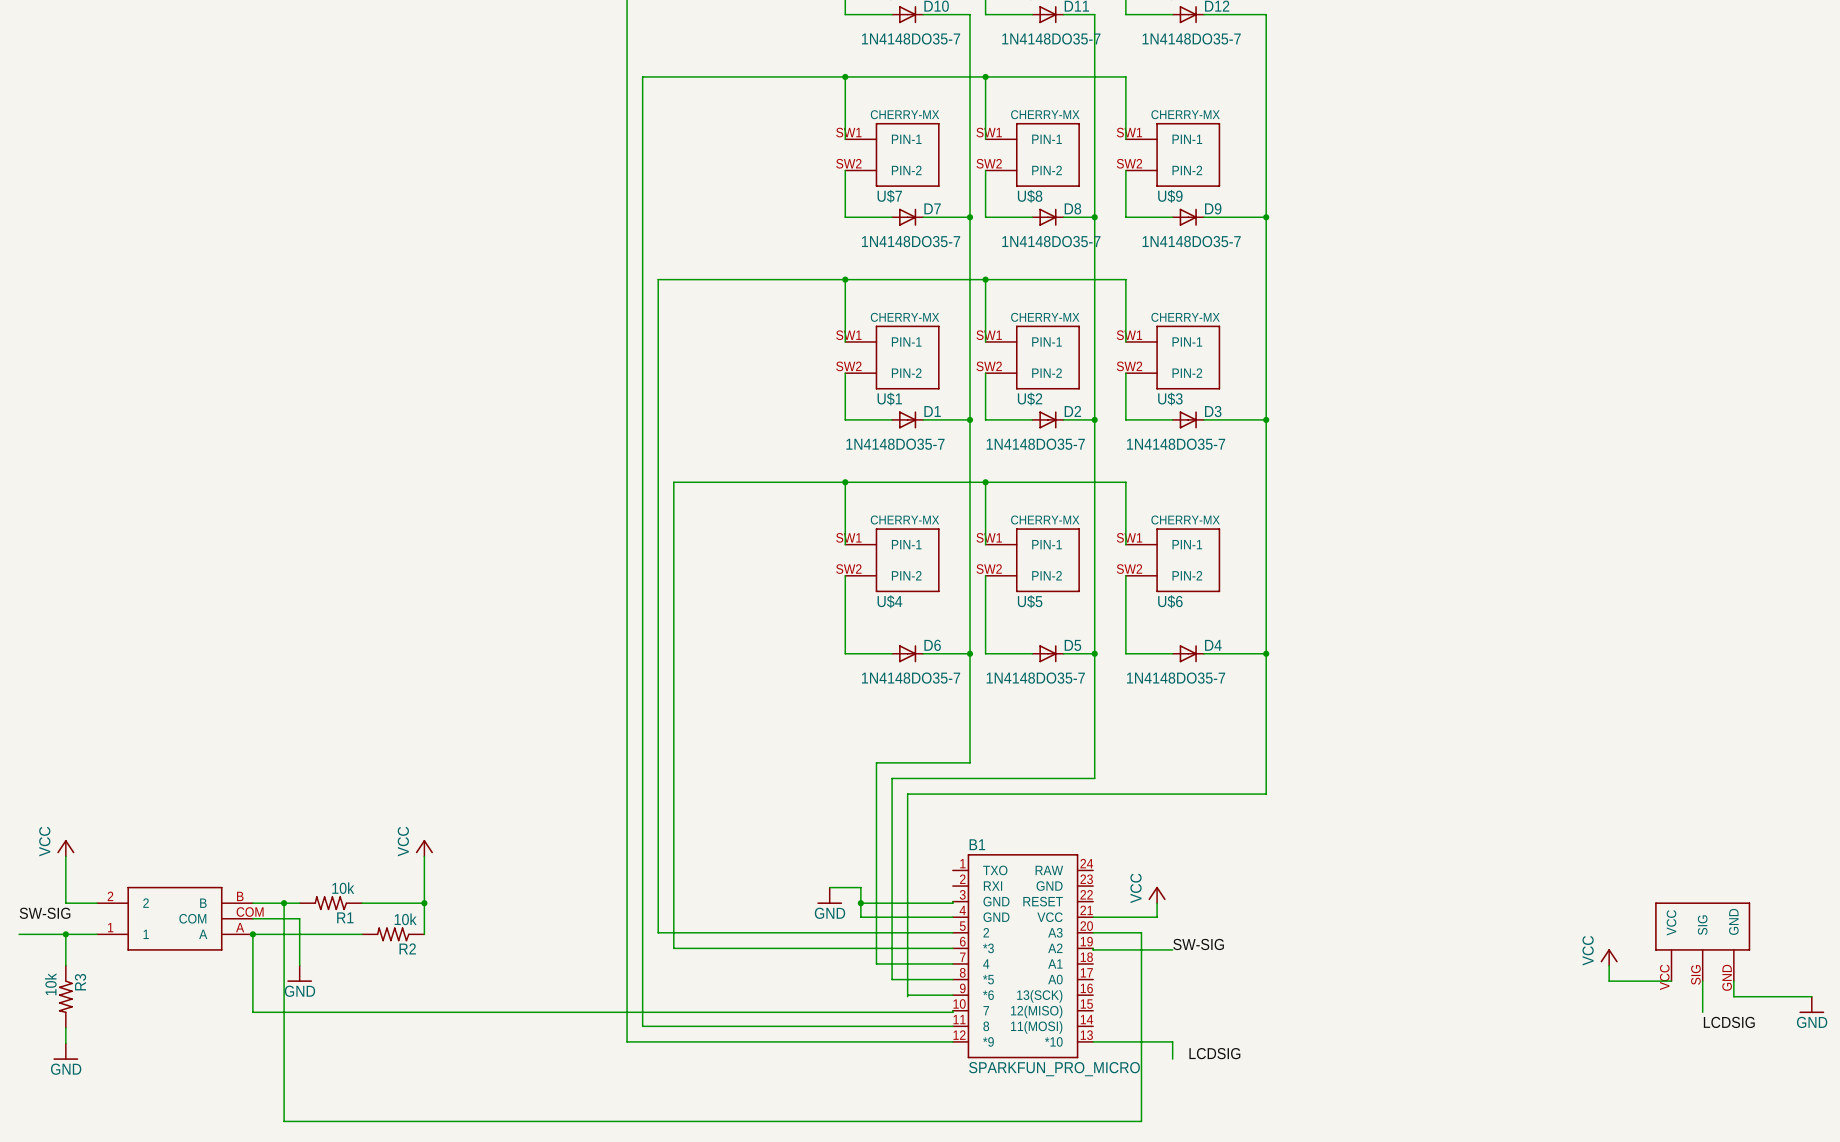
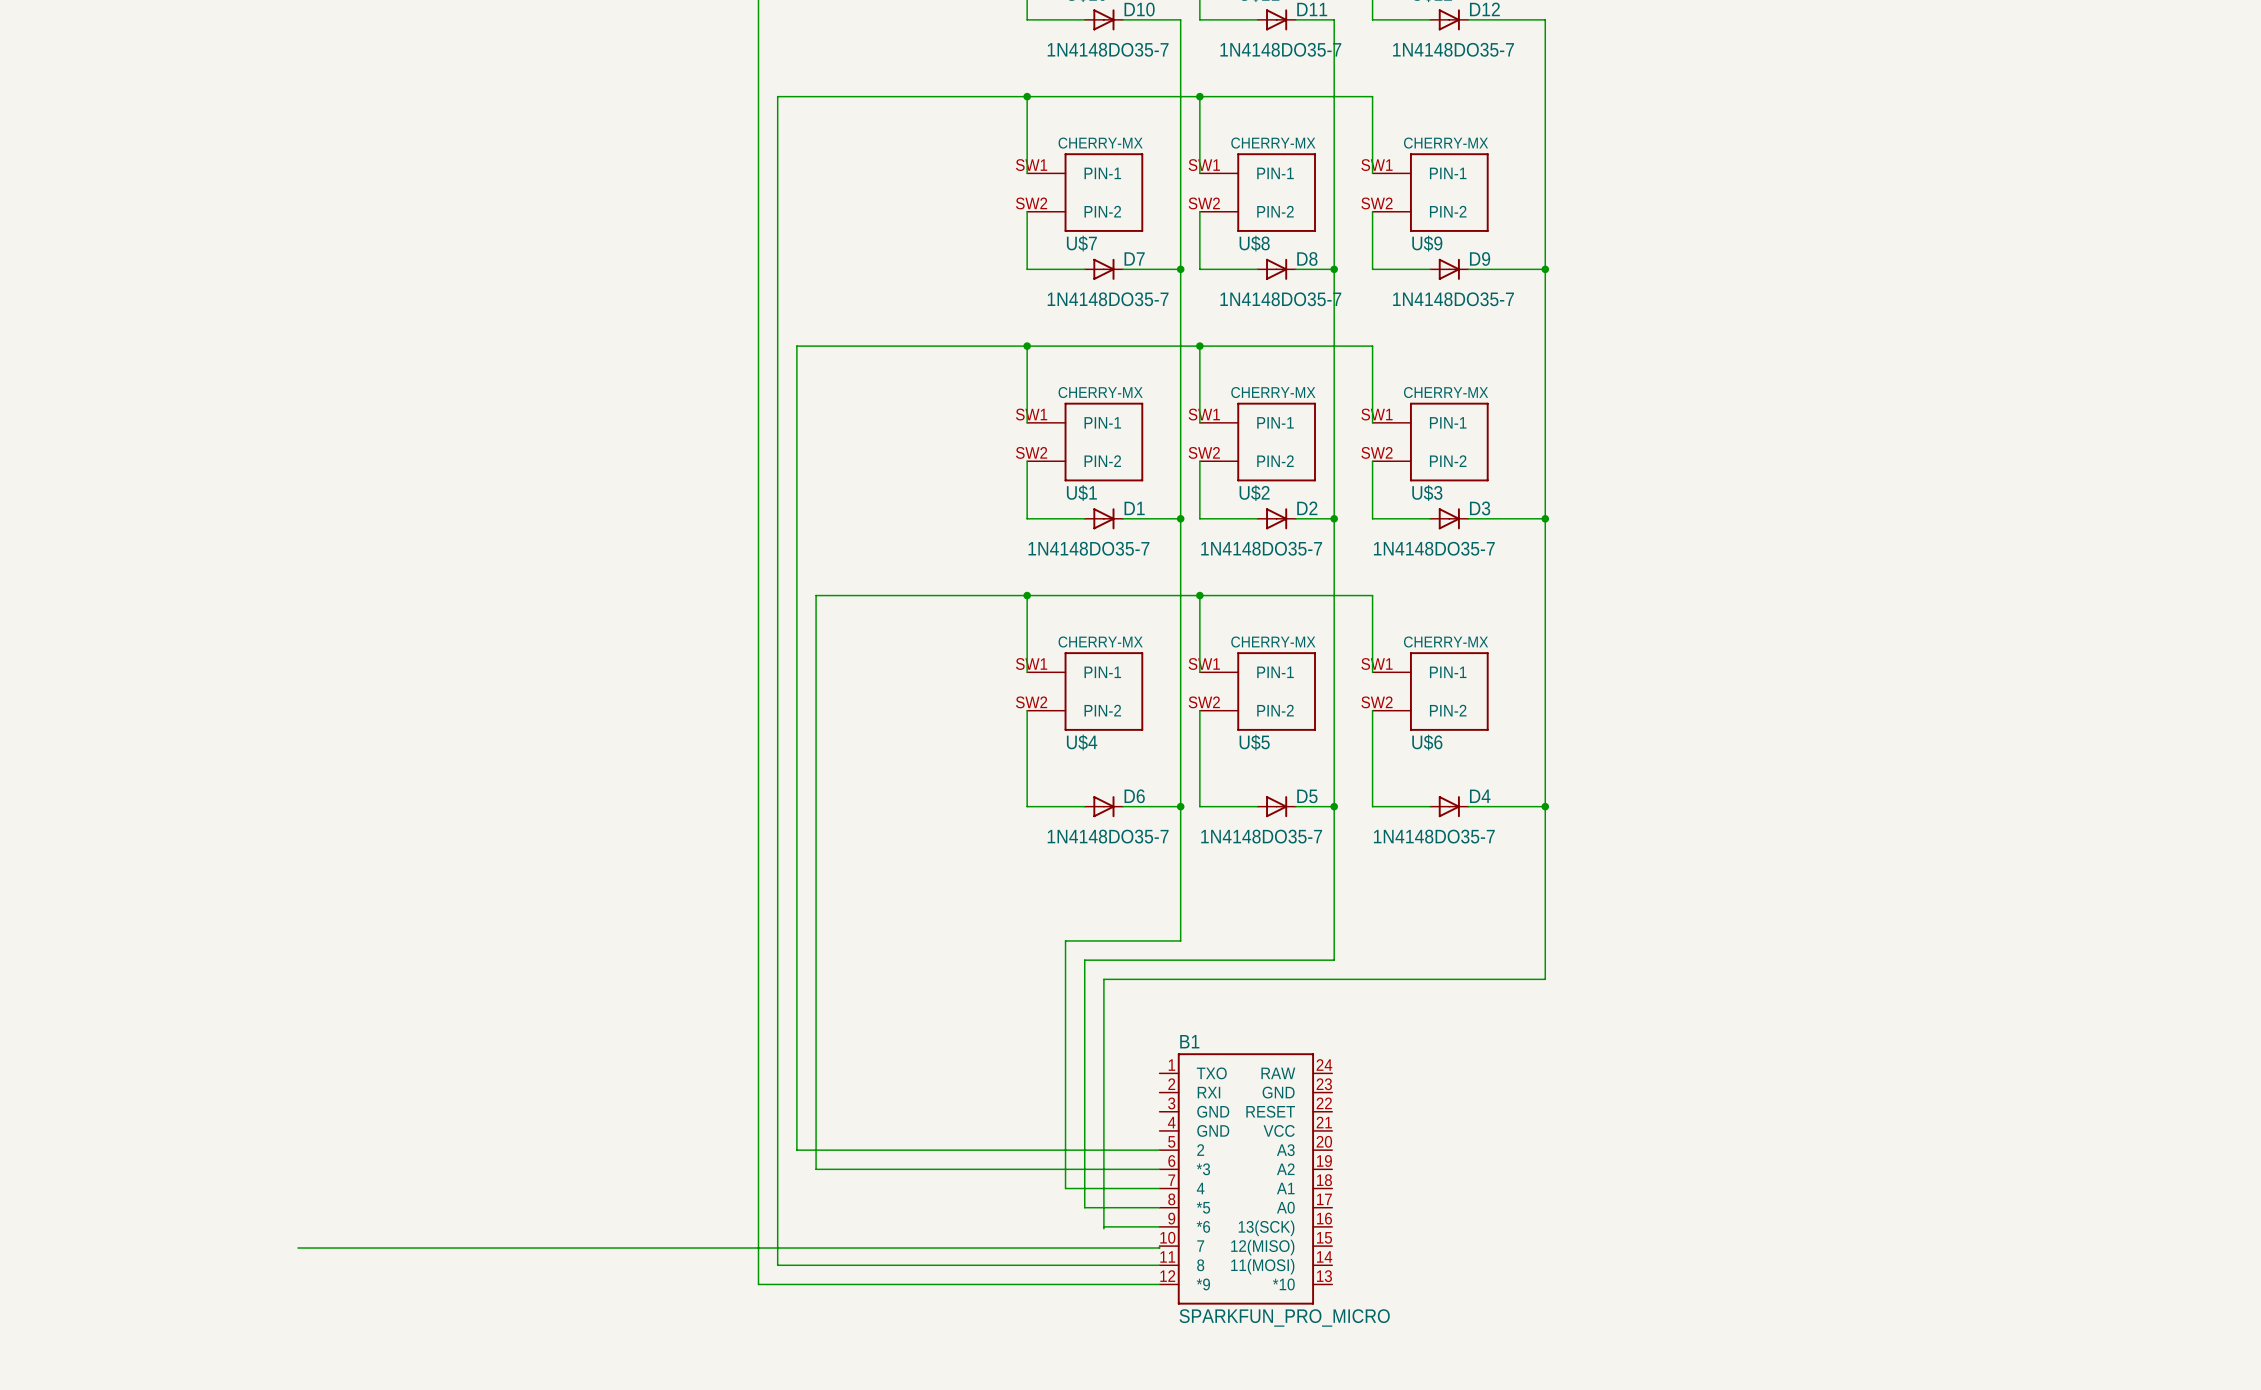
power symbol: VCC (65, 848) -> none
power symbol: VCC (424, 848) -> none
wire: (65, 856) (65, 903) (97, 903) -> none
wire: (424, 856) (424, 934) -> none
wire: (829, 887) (860, 887) (860, 917) (952, 917) -> none
power symbol: GND (829, 895) -> none
power symbol: VCC (1157, 895) -> none
wire: (952, 901) (952, 903) (860, 903) -> none
wire: (252, 903) (299, 903) -> none
wire: (284, 903) (284, 1121) (1141, 1121) (1141, 932) (1093, 932) -> none
junction: (284, 903) -> none
R1: 10k (330, 903) -> none
wire: (362, 903) (424, 903) -> none
junction: (424, 903) -> none
junction: (860, 903) -> none
wire: (1157, 903) (1157, 917) (1093, 917) -> none
label: SW-SIG (45, 913) -> none
part: (174, 918) -> none
wire: (252, 918) (299, 918) (299, 965) -> none
wire: (19, 934) (97, 934) -> none
wire: (65, 934) (65, 965) -> none
junction: (65, 934) -> none
junction: (252, 934) -> none
wire: (362, 934) (252, 934) (252, 1012) -> none
R2: 10k (393, 934) -> none
part: (1702, 941) -> none
label: SW-SIG (1198, 944) -> none
wire: (1093, 948) (1093, 949) (1172, 949) -> none
power symbol: VCC (1609, 957) -> none
wire: (1609, 965) (1609, 981) (1671, 981) -> none
power symbol: GND (299, 973) -> none
wire: (1702, 981) (1702, 1012) -> none
wire: (1733, 981) (1733, 996) (1811, 996) -> none
R3: 10k (65, 996) -> none
power symbol: GND (1811, 1004) -> none
label: LCDSIG (1729, 1022) -> none
wire: (65, 1027) (65, 1043) -> none
wire: (1093, 1041) (1172, 1041) (1172, 1059) -> none
power symbol: GND (65, 1051) -> none
label: LCDSIG (1214, 1053) -> none

